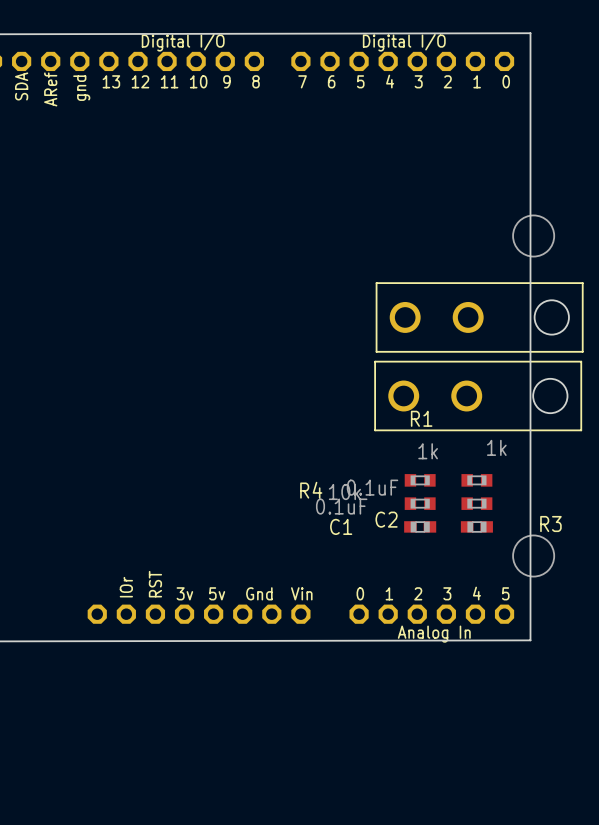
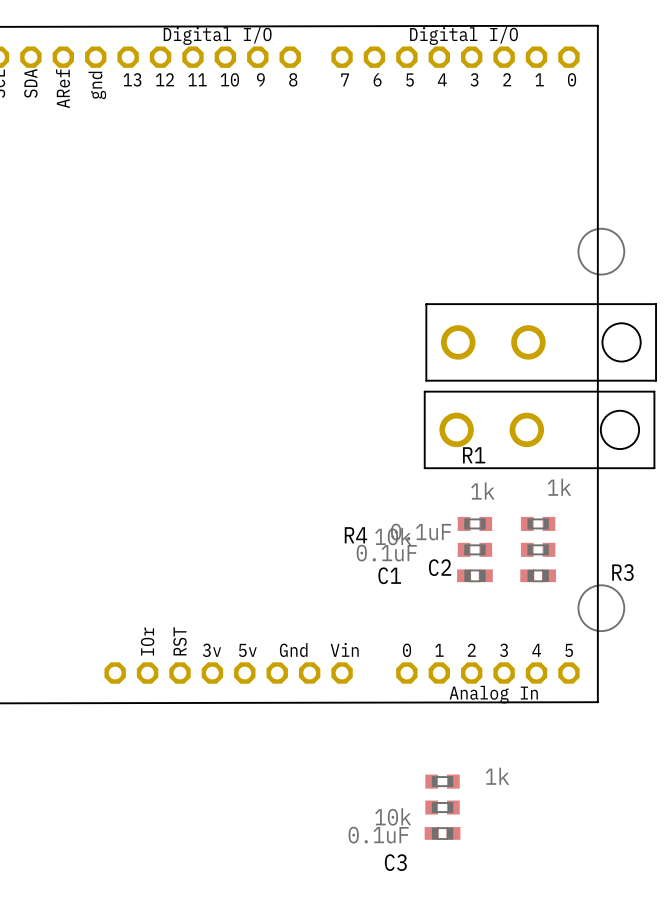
part: none -> 1k (442, 781)
part: none -> 10k (442, 807)
C3: none -> 0.1uF (442, 833)

